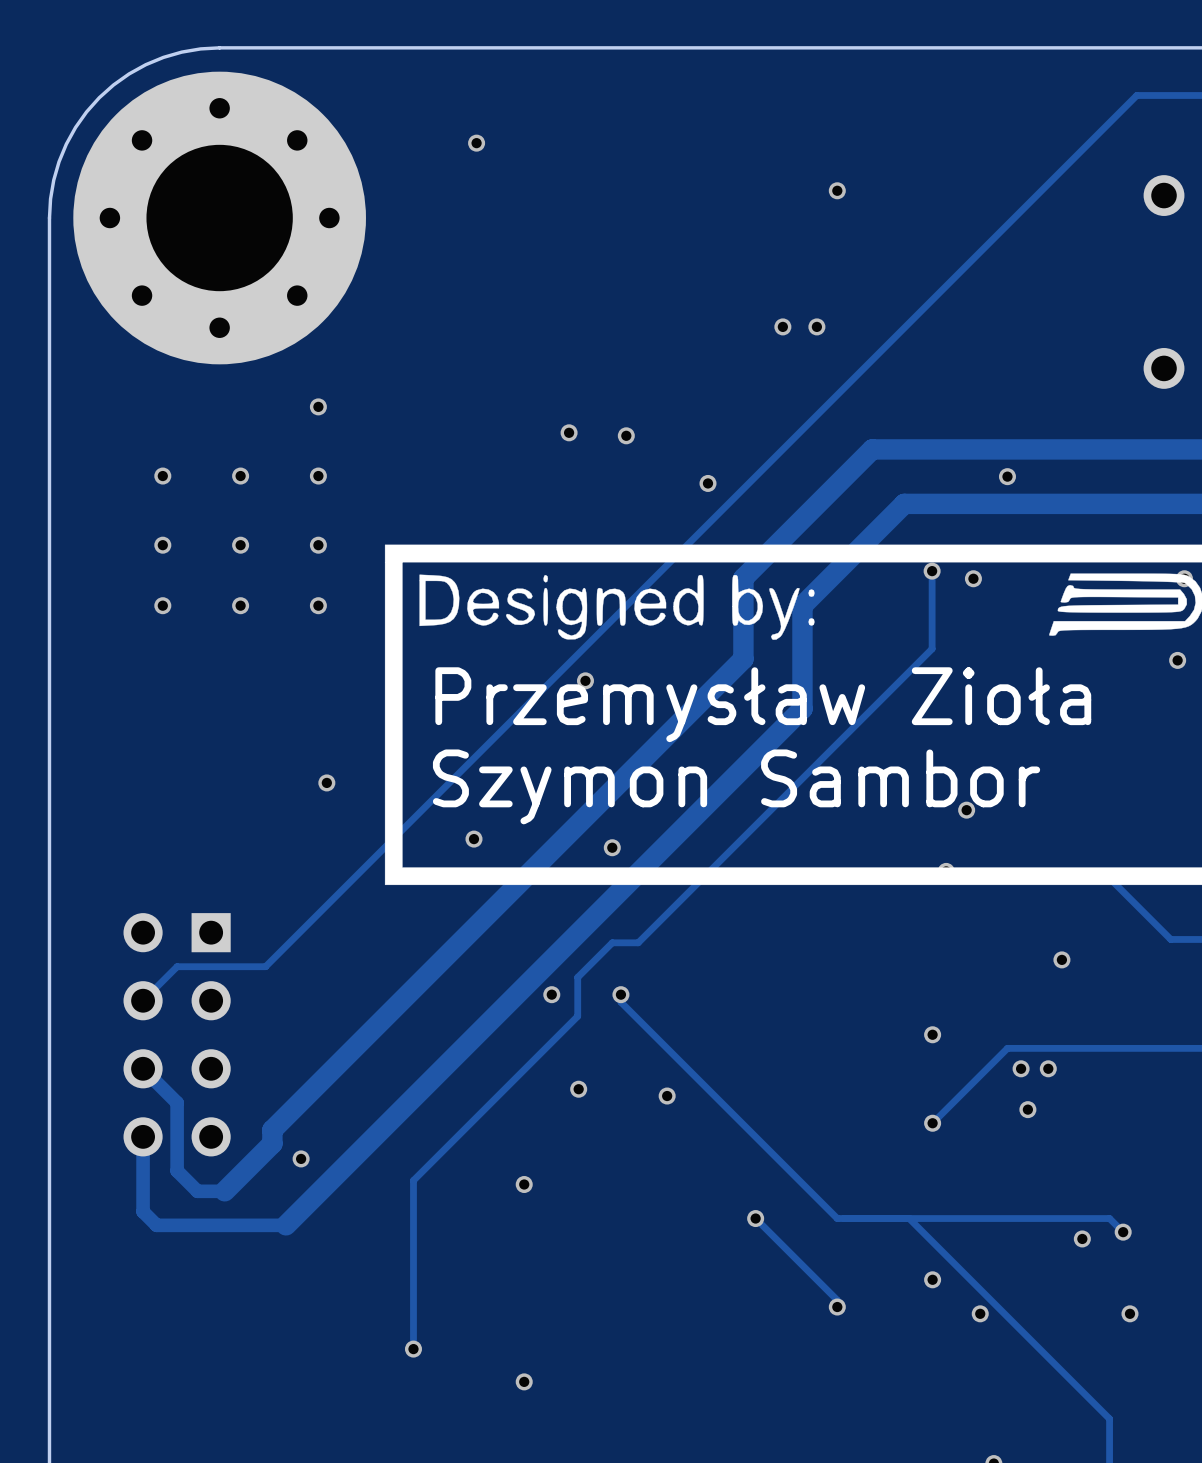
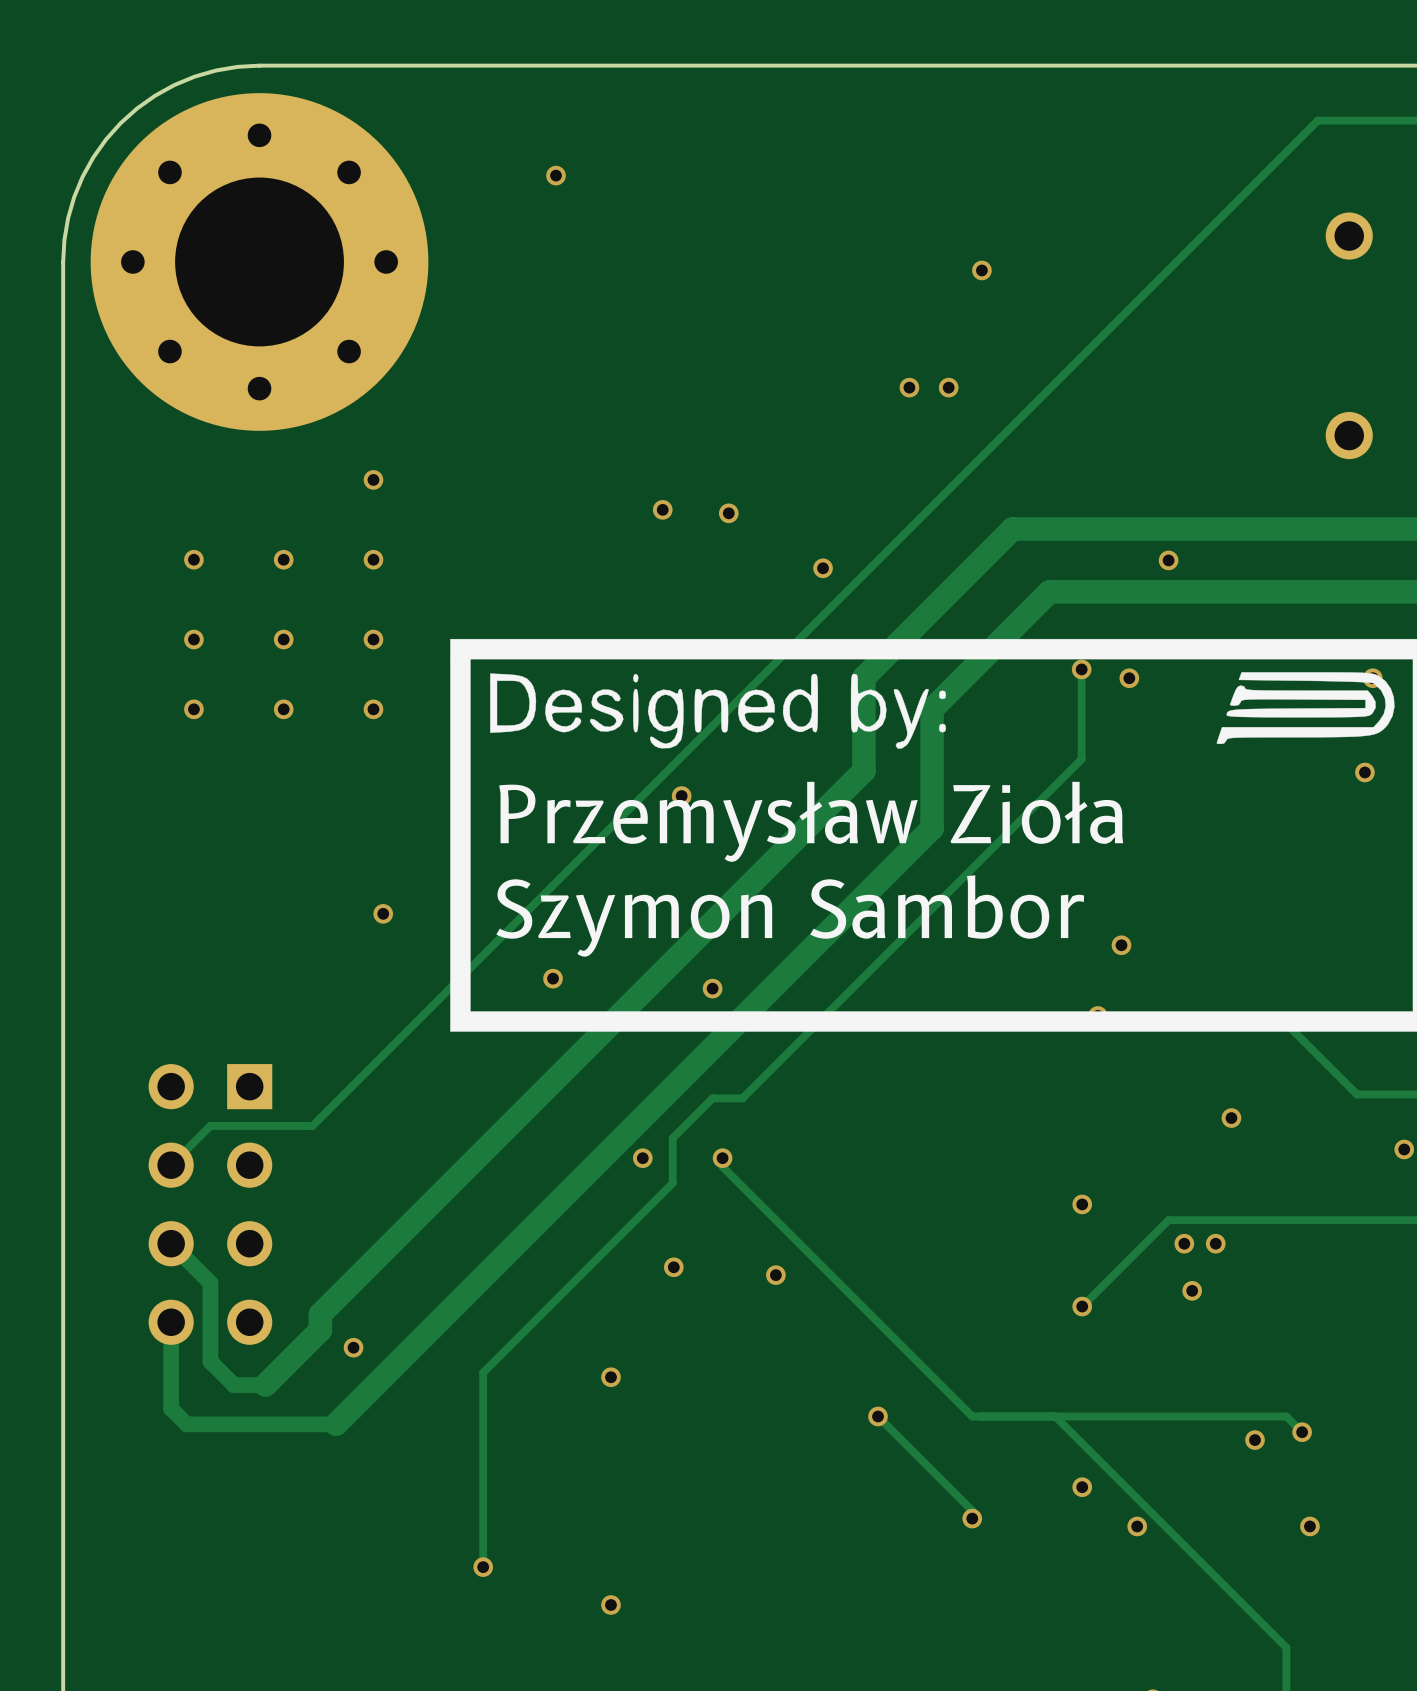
via position: (837, 190) -> (981, 270)

